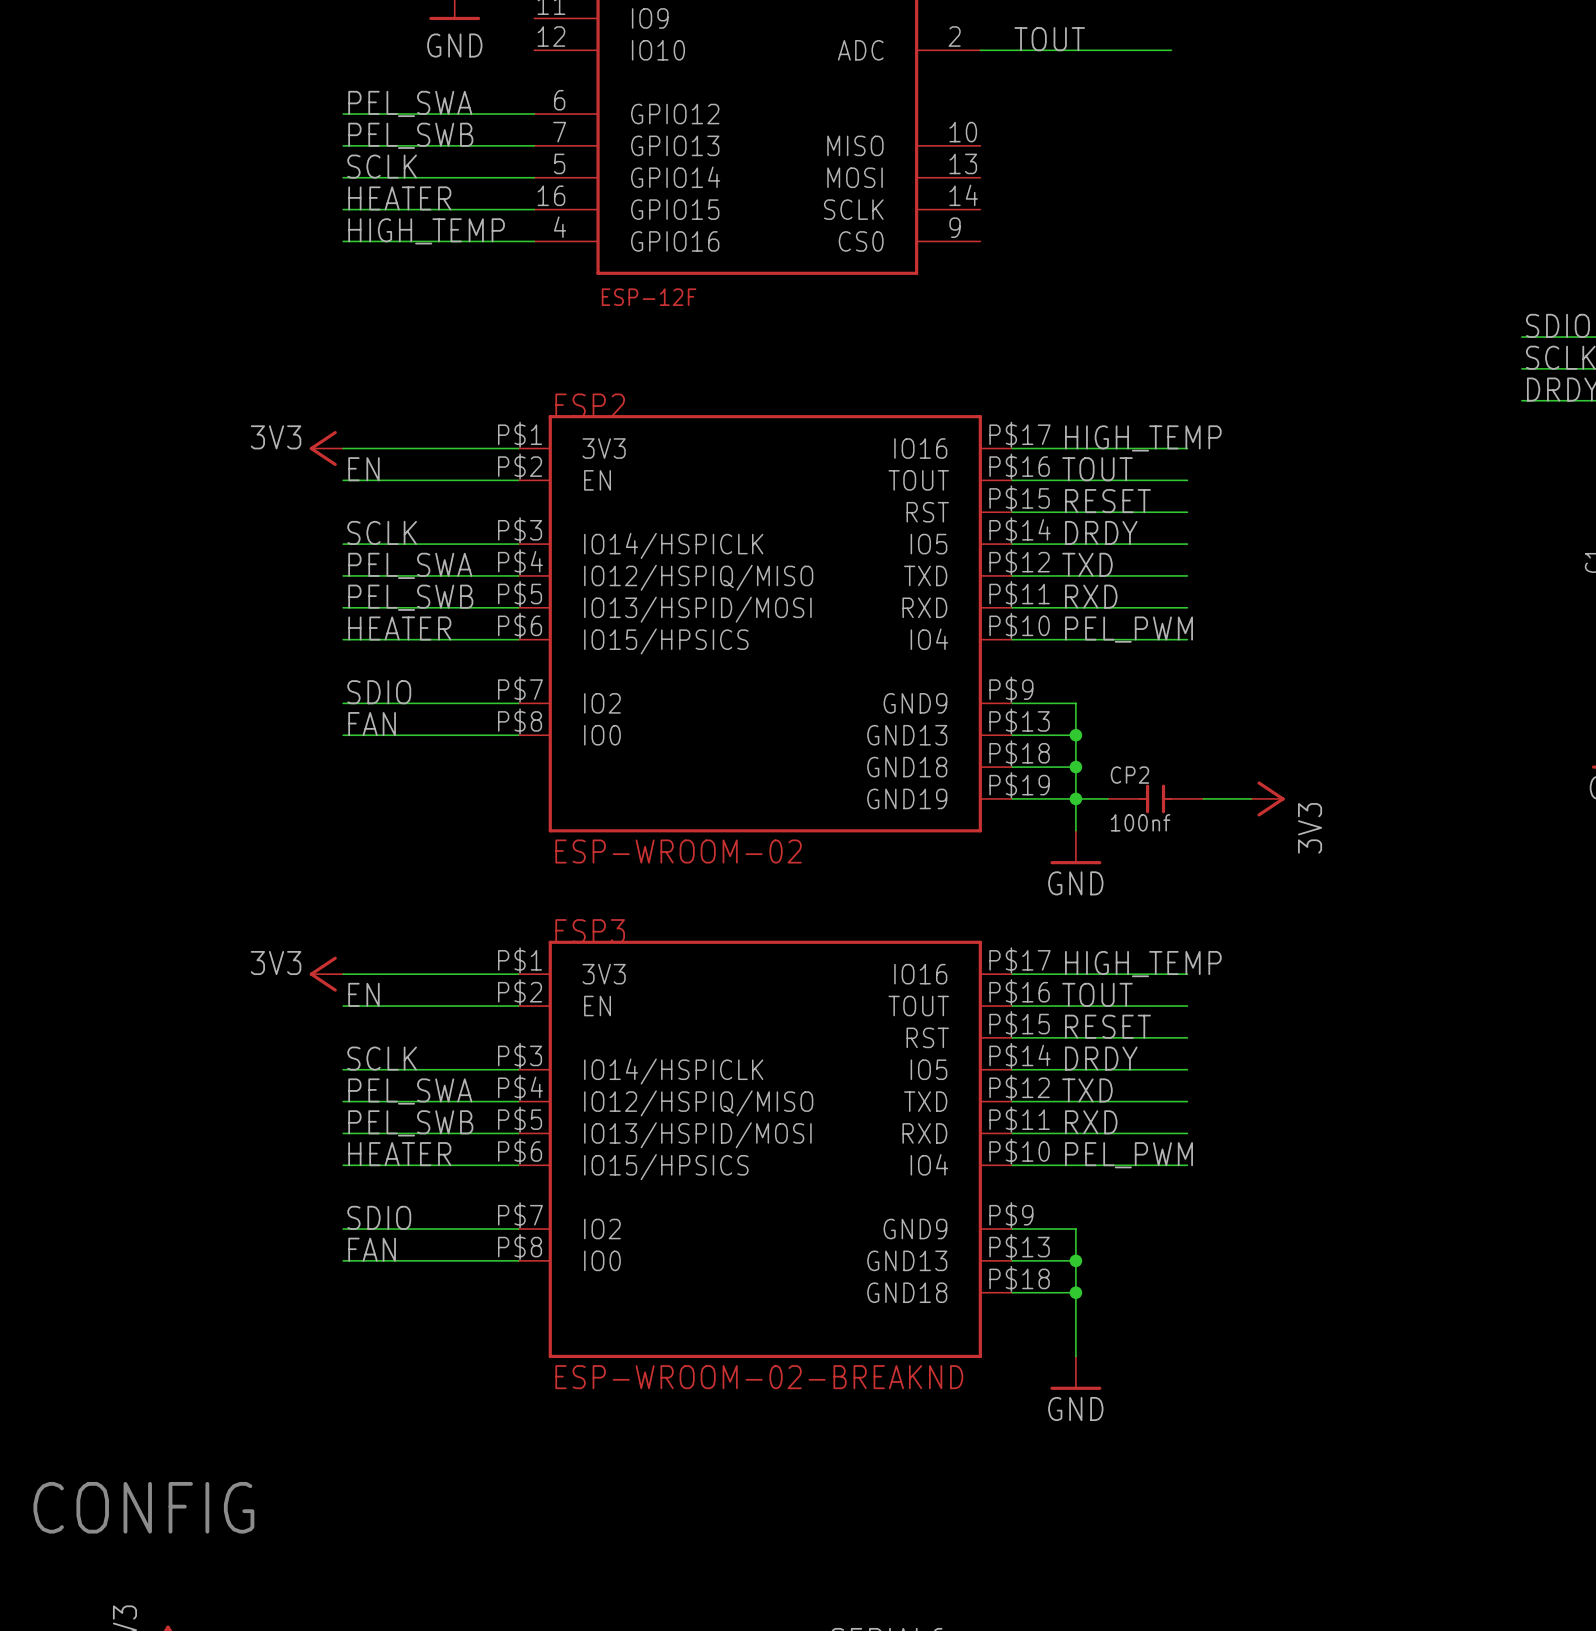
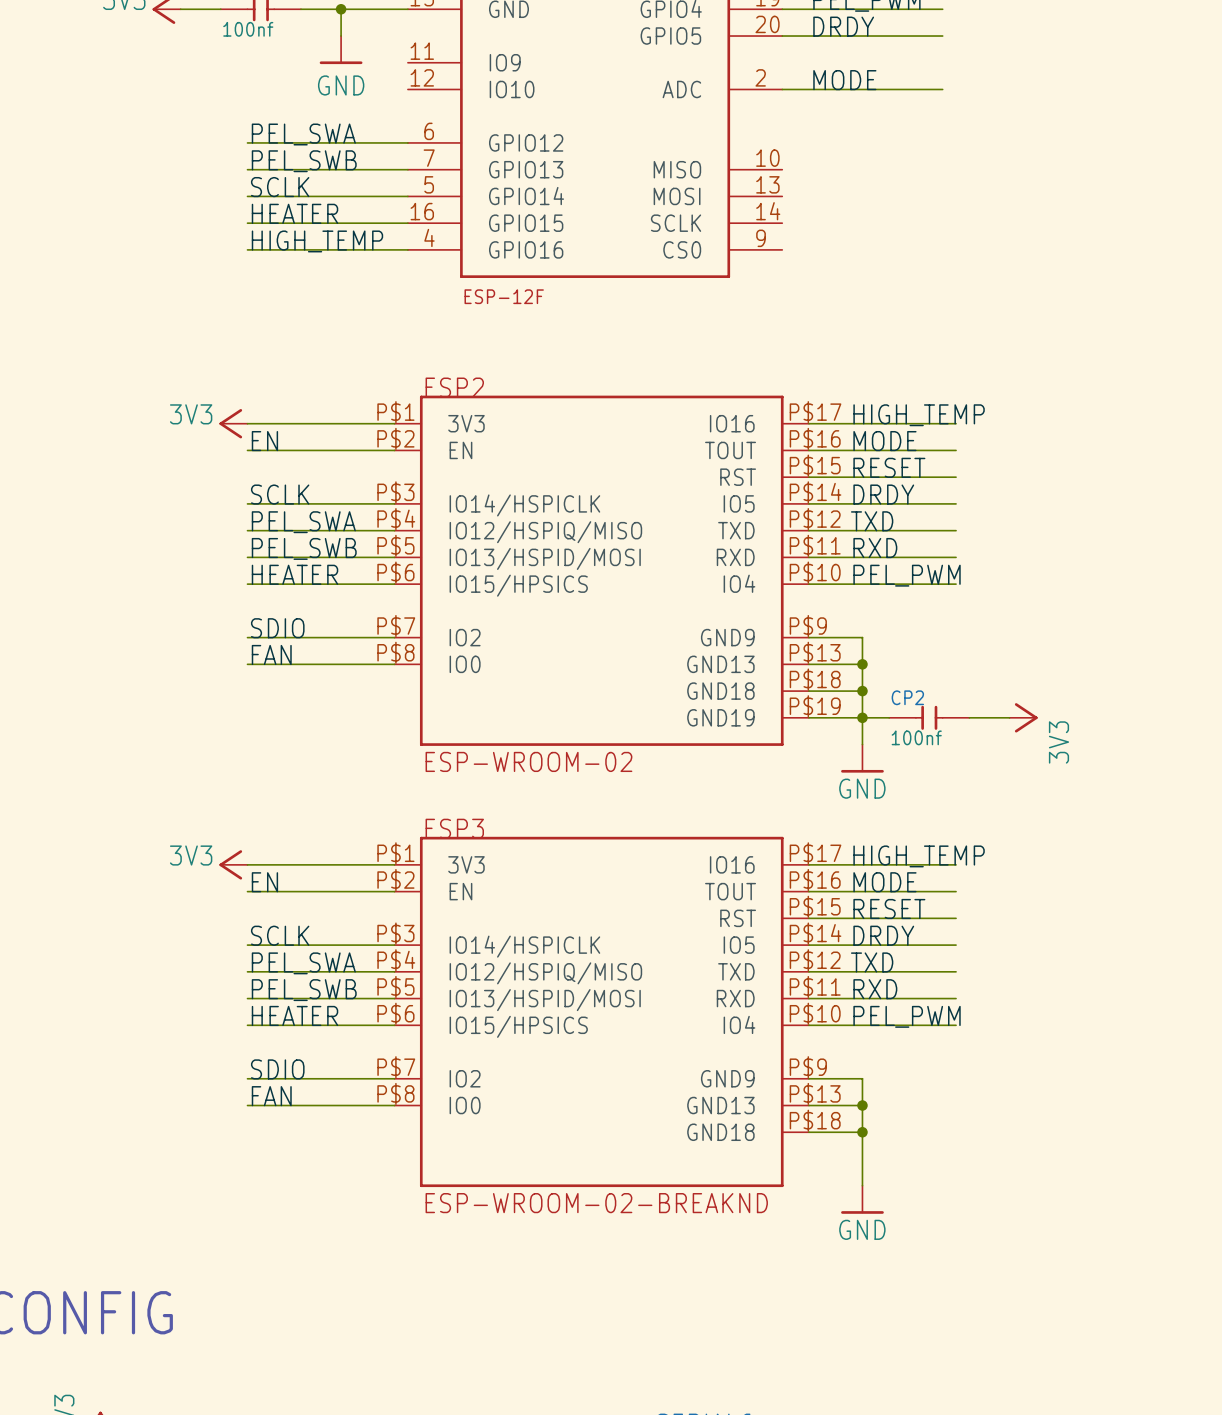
label: TOUT (1049, 39) -> MODE (844, 80)
label: TOUT (1097, 469) -> MODE (884, 441)
label: TOUT (1097, 994) -> MODE (884, 882)

